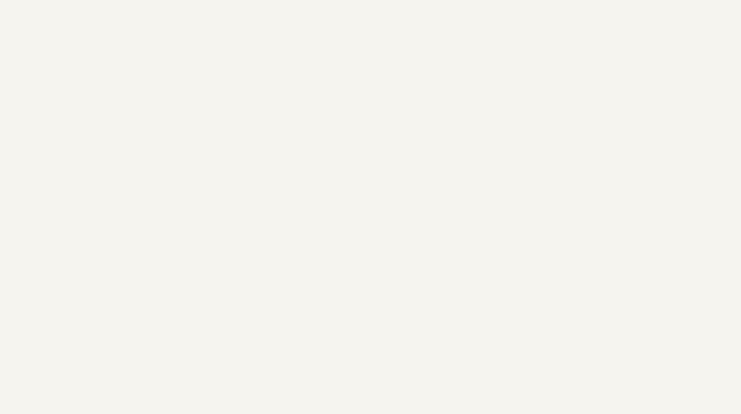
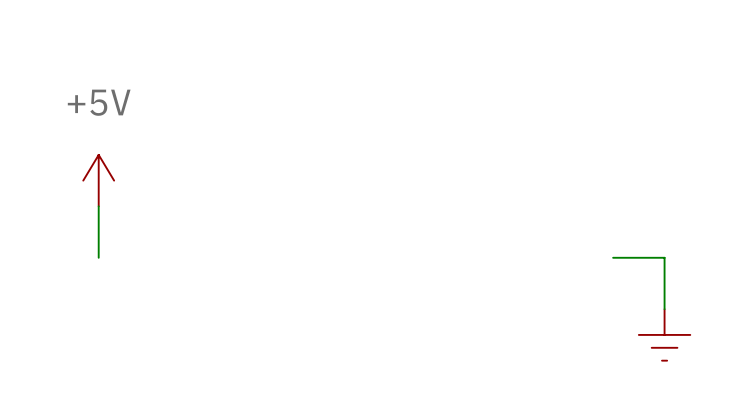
power symbol: none -> +5V (98, 180)
wire: none -> (98, 206) (98, 257)
wire: none -> (613, 257) (664, 257) (664, 309)
power symbol: none -> (664, 334)

